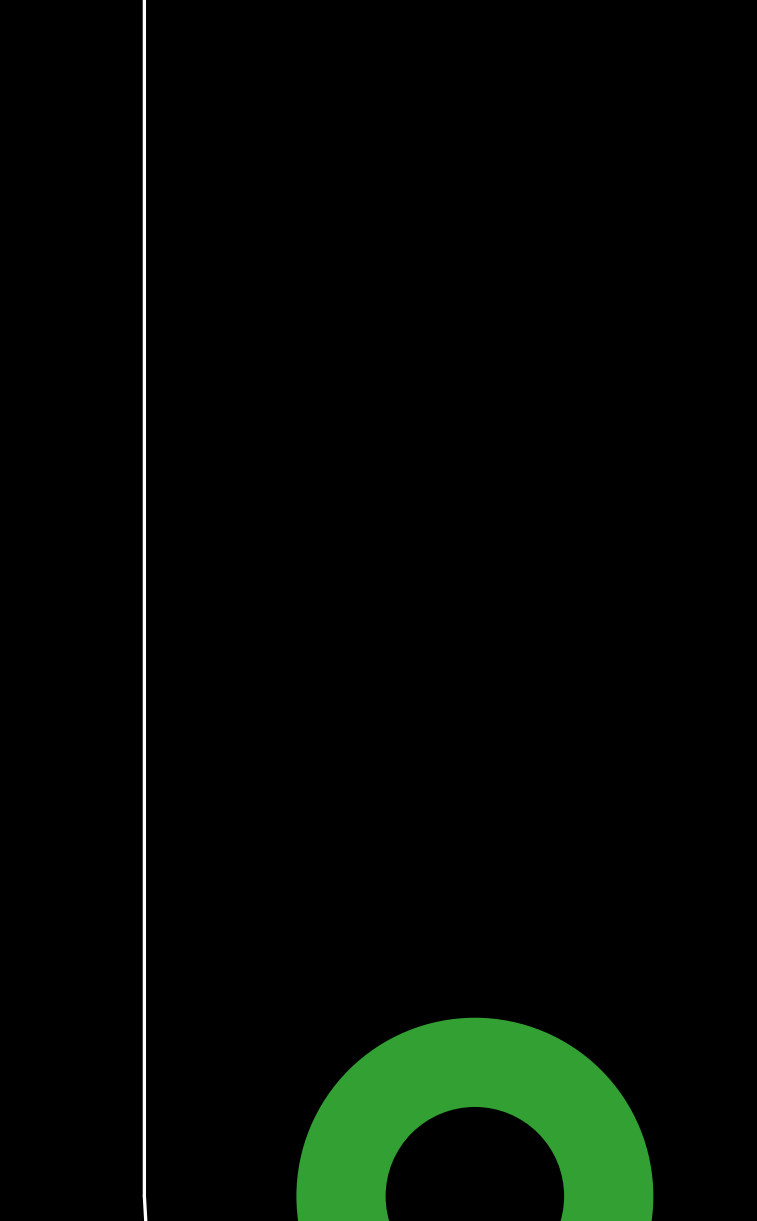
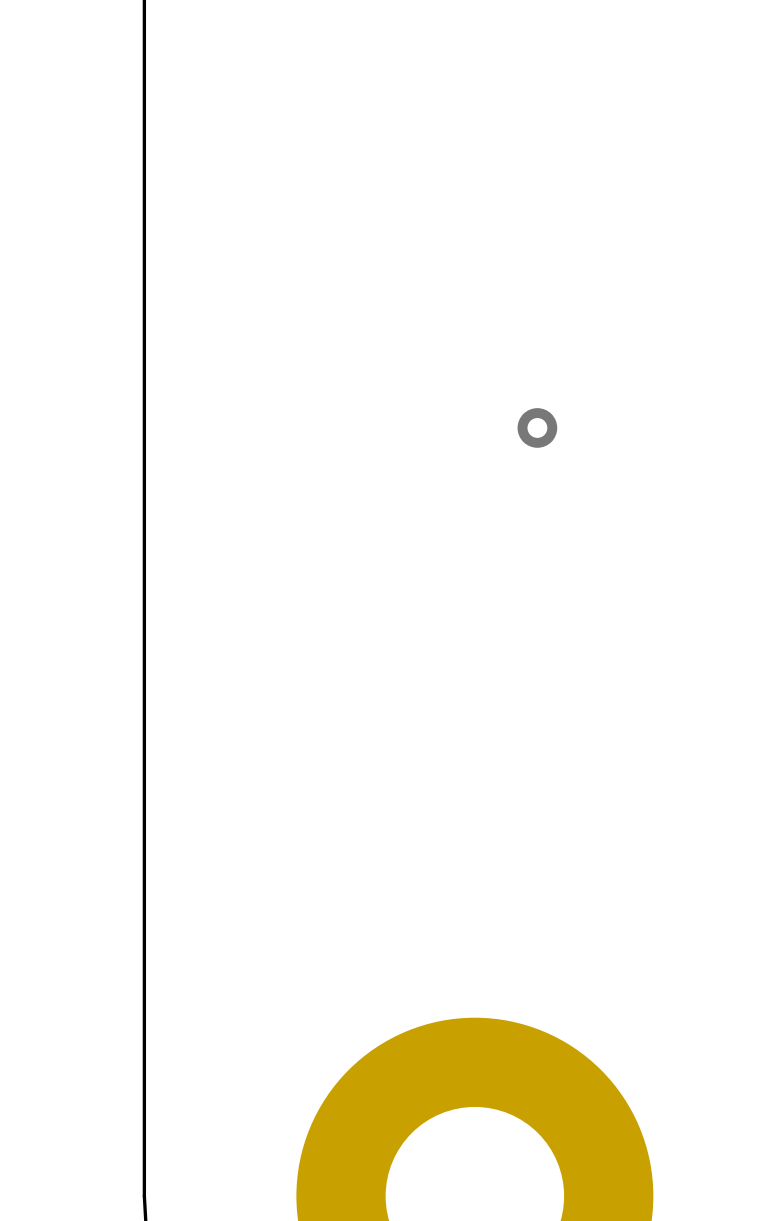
via: none -> (537, 427)

